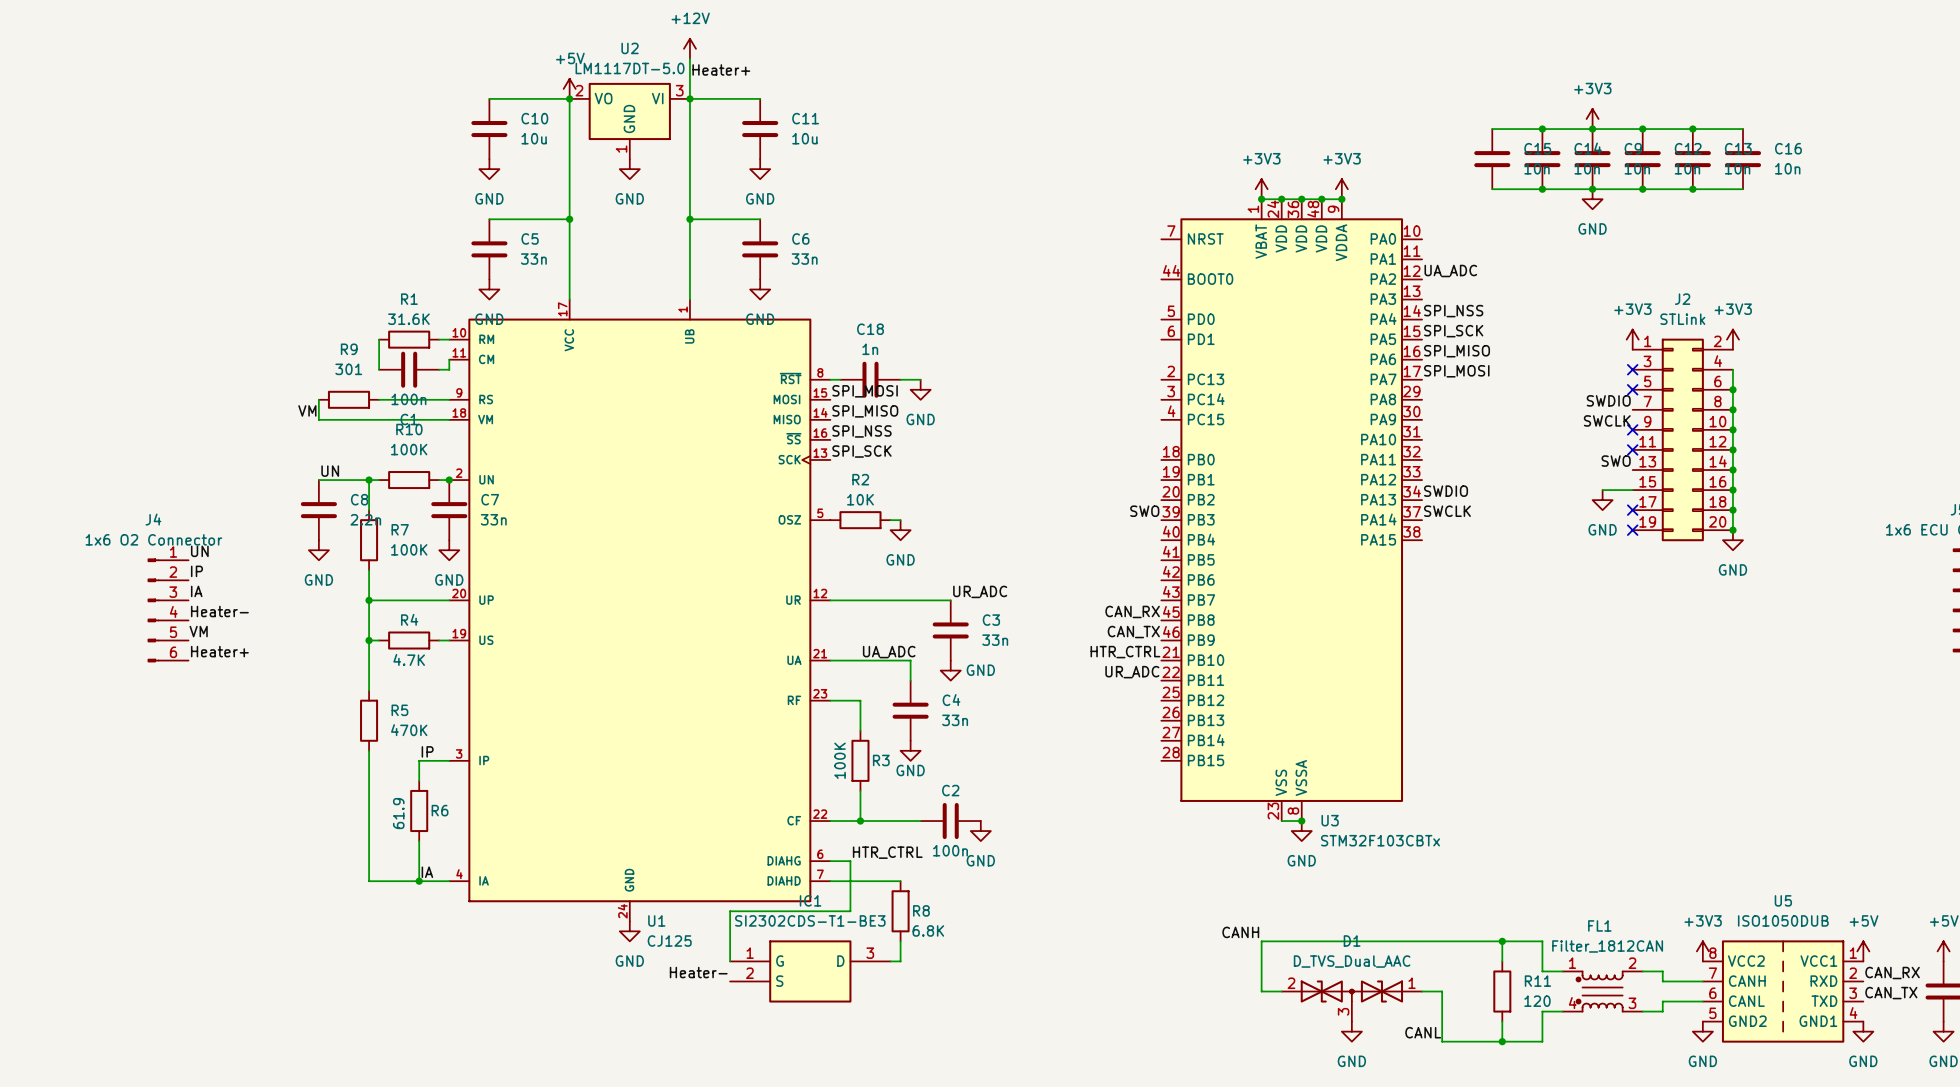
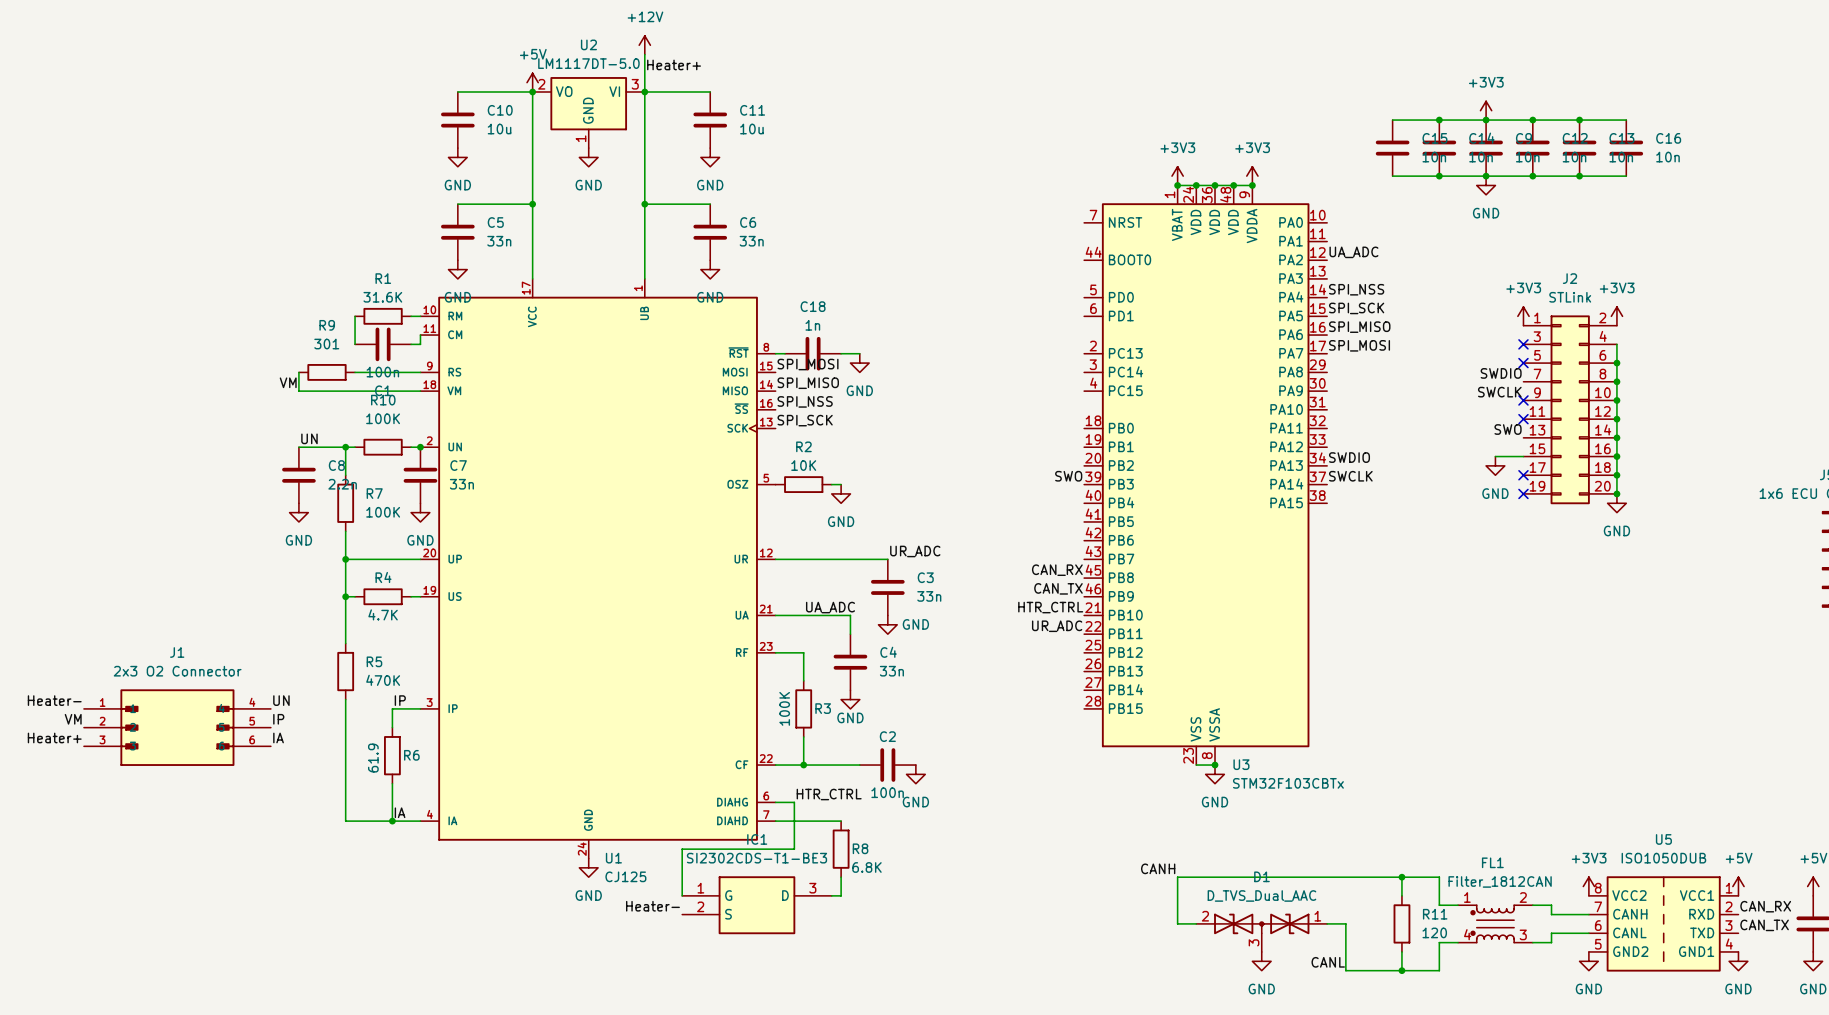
label: UN (199, 551) -> none
label: IP (196, 571) -> none
label: IA (196, 591) -> none
J4: 1x6 O2 Connector (168, 610) -> none
label position: Heater- (219, 611) -> Heater- (54, 700)
label position: VM (198, 631) -> VM (73, 719)
label position: Heater+ (219, 651) -> Heater+ (54, 737)
label: none -> UN (281, 700)
label: none -> IP (278, 719)
J1: none -> 2x3 O2 Connector (177, 727)
label: none -> IA (278, 737)

